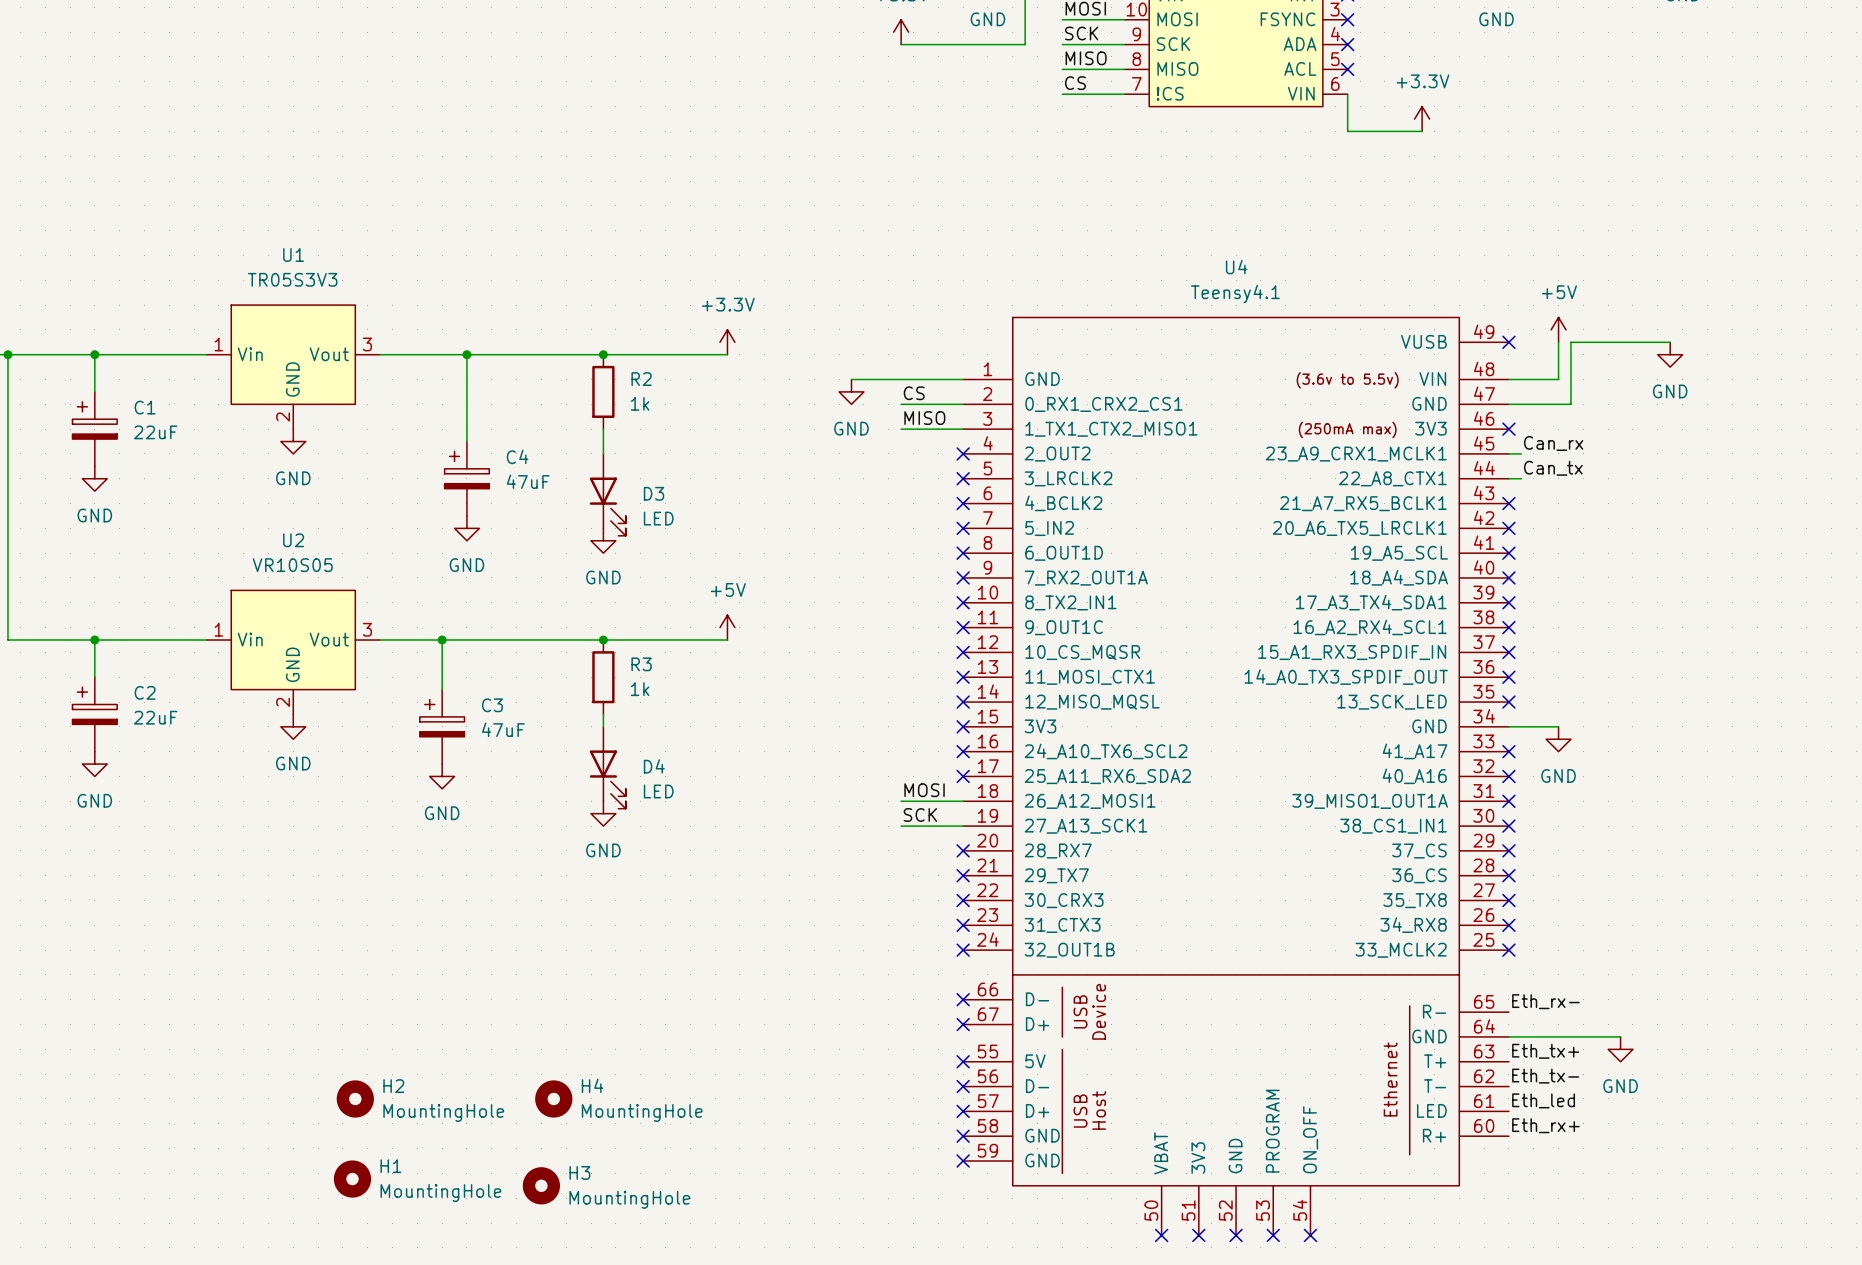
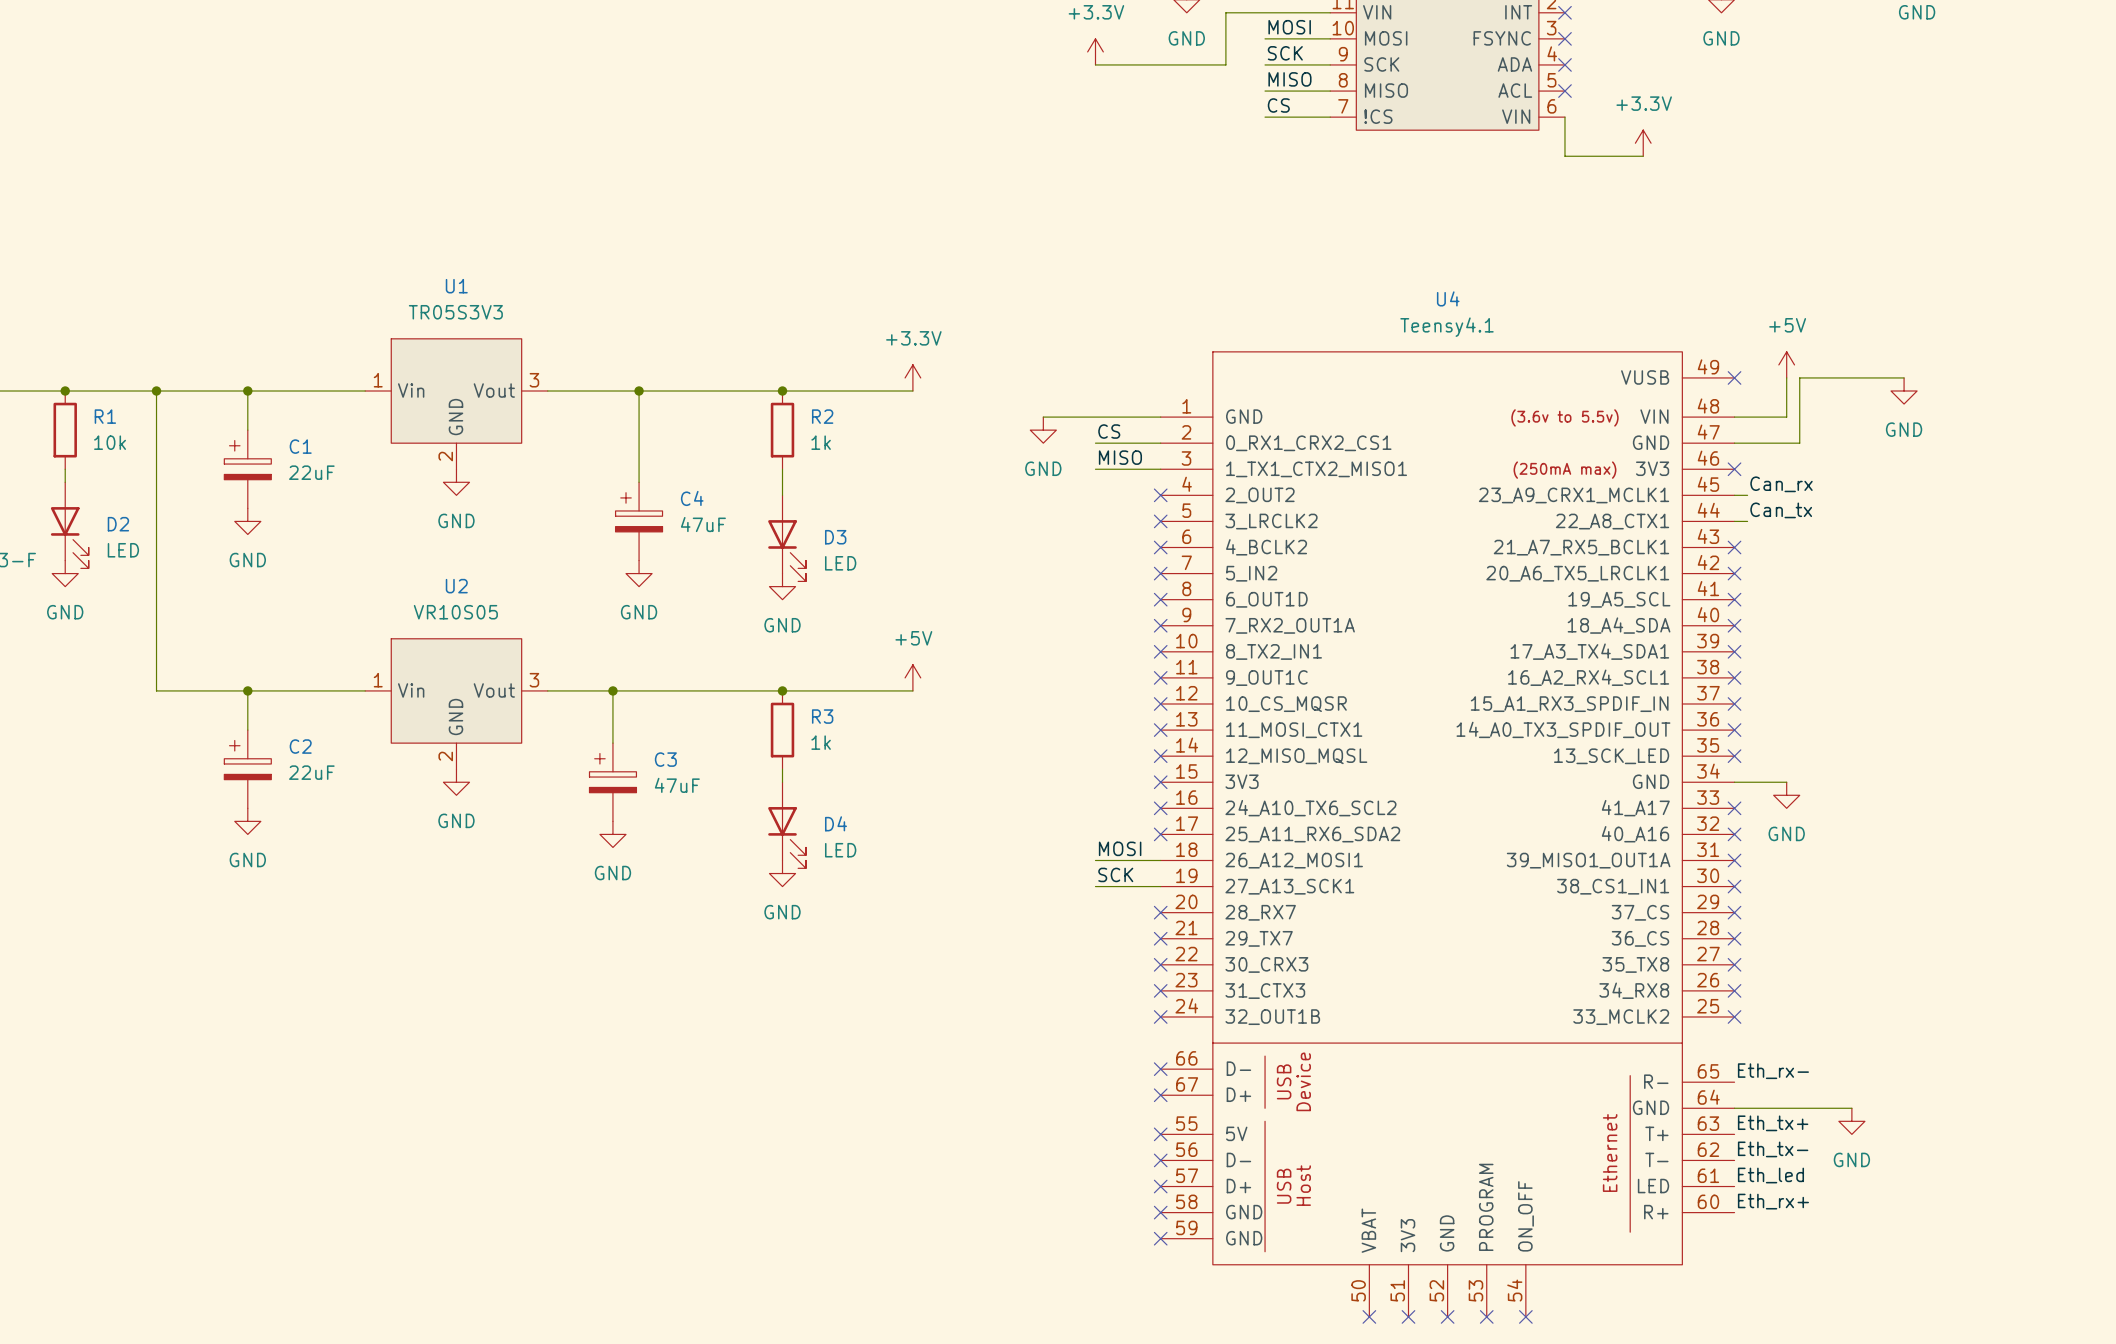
H2: MountingHole (355, 1098) -> none
H4: MountingHole (553, 1098) -> none
H1: MountingHole (352, 1179) -> none
H3: MountingHole (541, 1185) -> none

